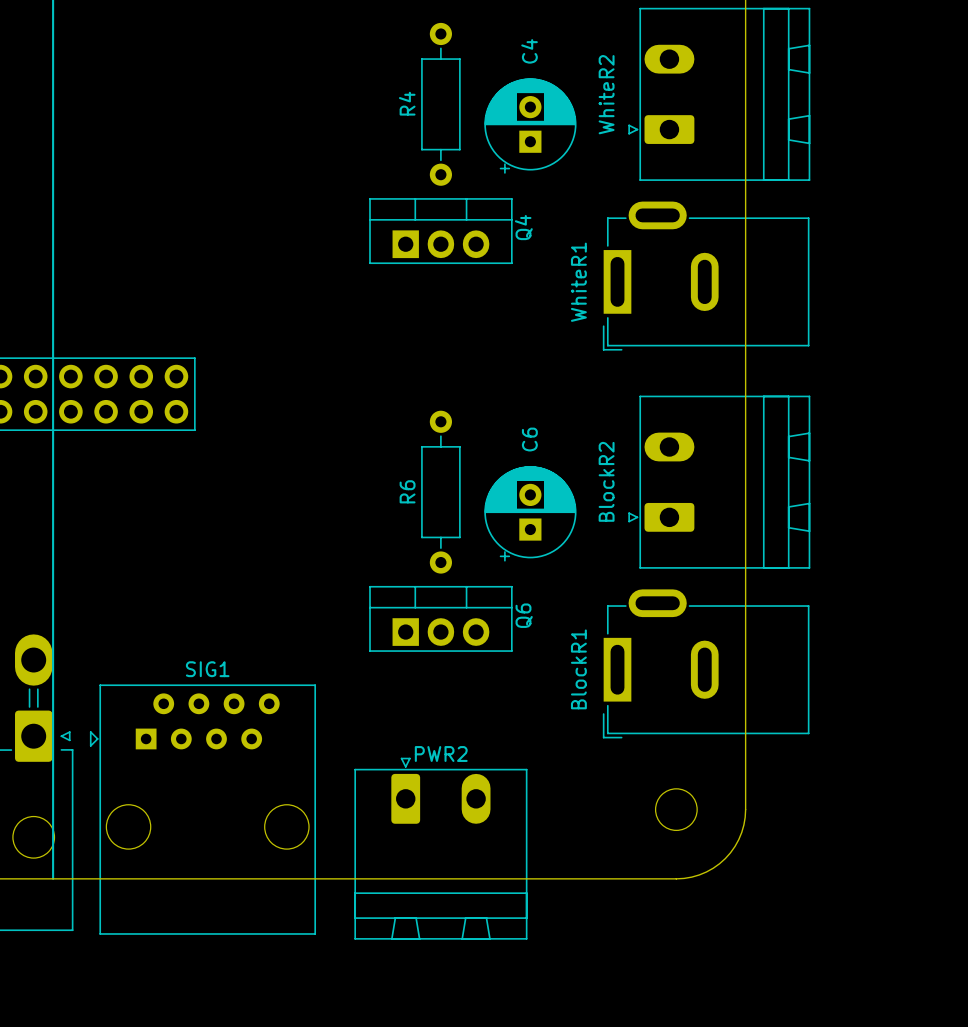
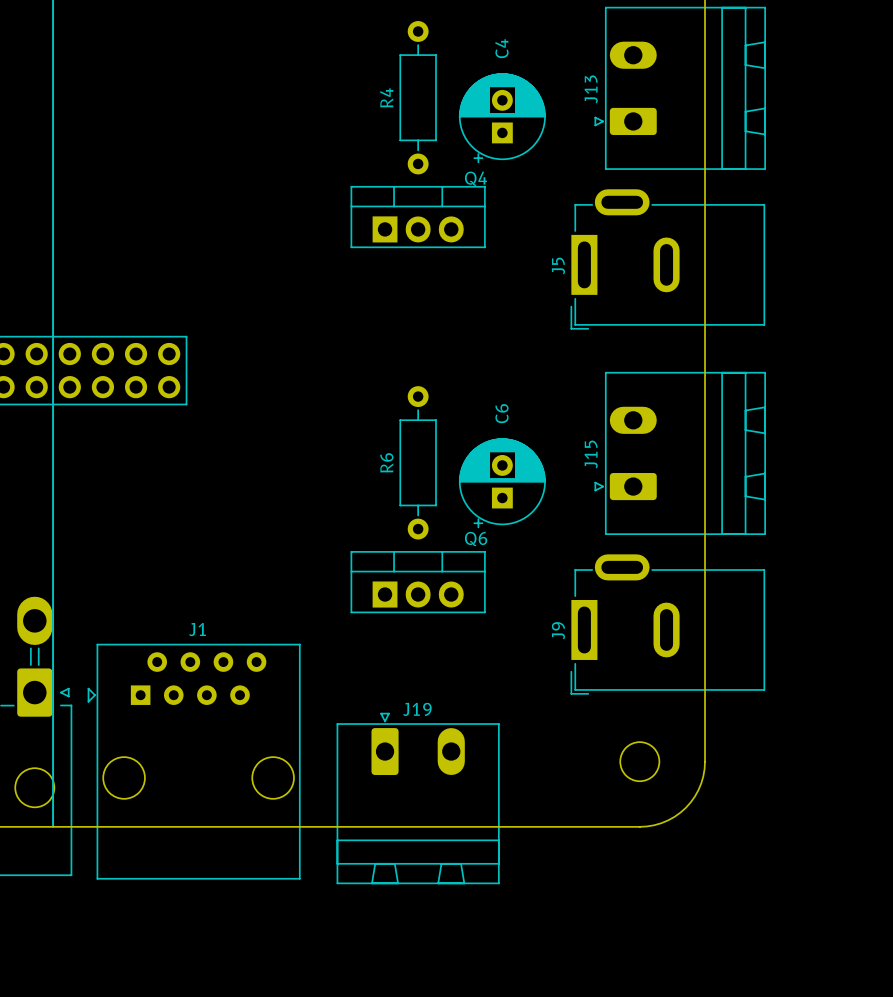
WhiteR2 name: WhiteR2 (606, 94) -> J13 (591, 89)
Q4 name rotation: 0° (523, 227) -> 90° clockwise (475, 178)
Q4 name position: Q4 (523, 227) -> Q4 (475, 178)
WhiteR1 name: WhiteR1 (578, 282) -> J5 (558, 265)
BlockR2 name: BlockR2 (606, 481) -> J15 (591, 454)
Q6 name rotation: 0° (524, 615) -> 90° clockwise (476, 538)
Q6 name position: Q6 (524, 615) -> Q6 (476, 538)
SIG1 name: SIG1 (207, 669) -> J1 (197, 629)
BlockR1 name: BlockR1 (578, 669) -> J9 (558, 630)
PWR2 name: PWR2 (441, 754) -> J19 (417, 709)

